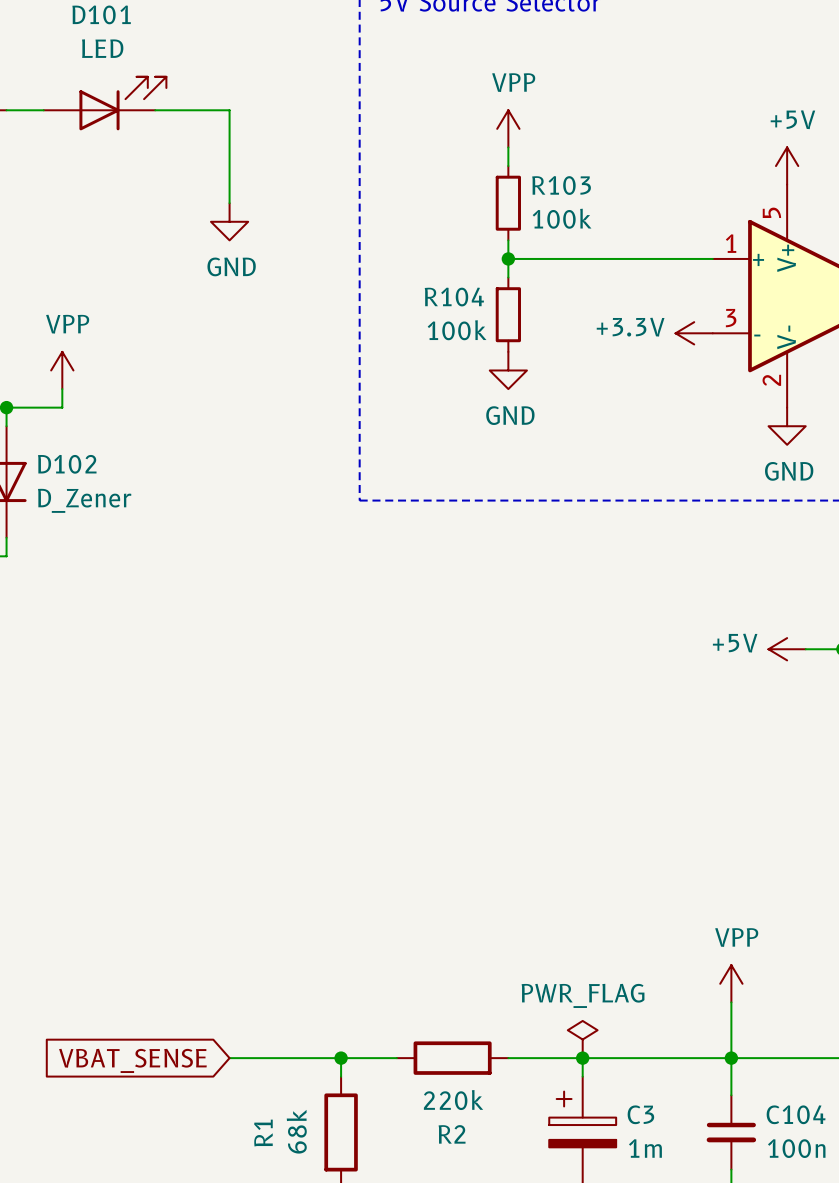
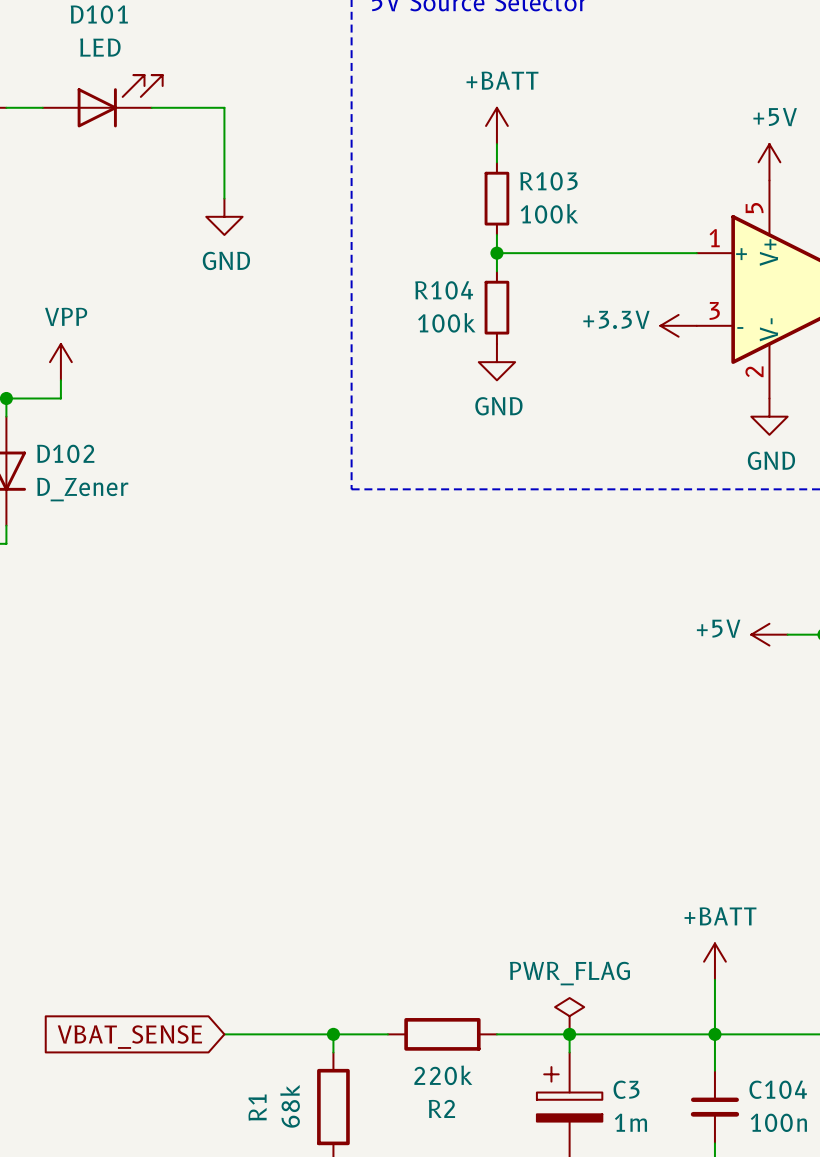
power symbol: VPP (508, 128) -> +BATT (496, 125)
power symbol: VPP (731, 983) -> +BATT (714, 961)

